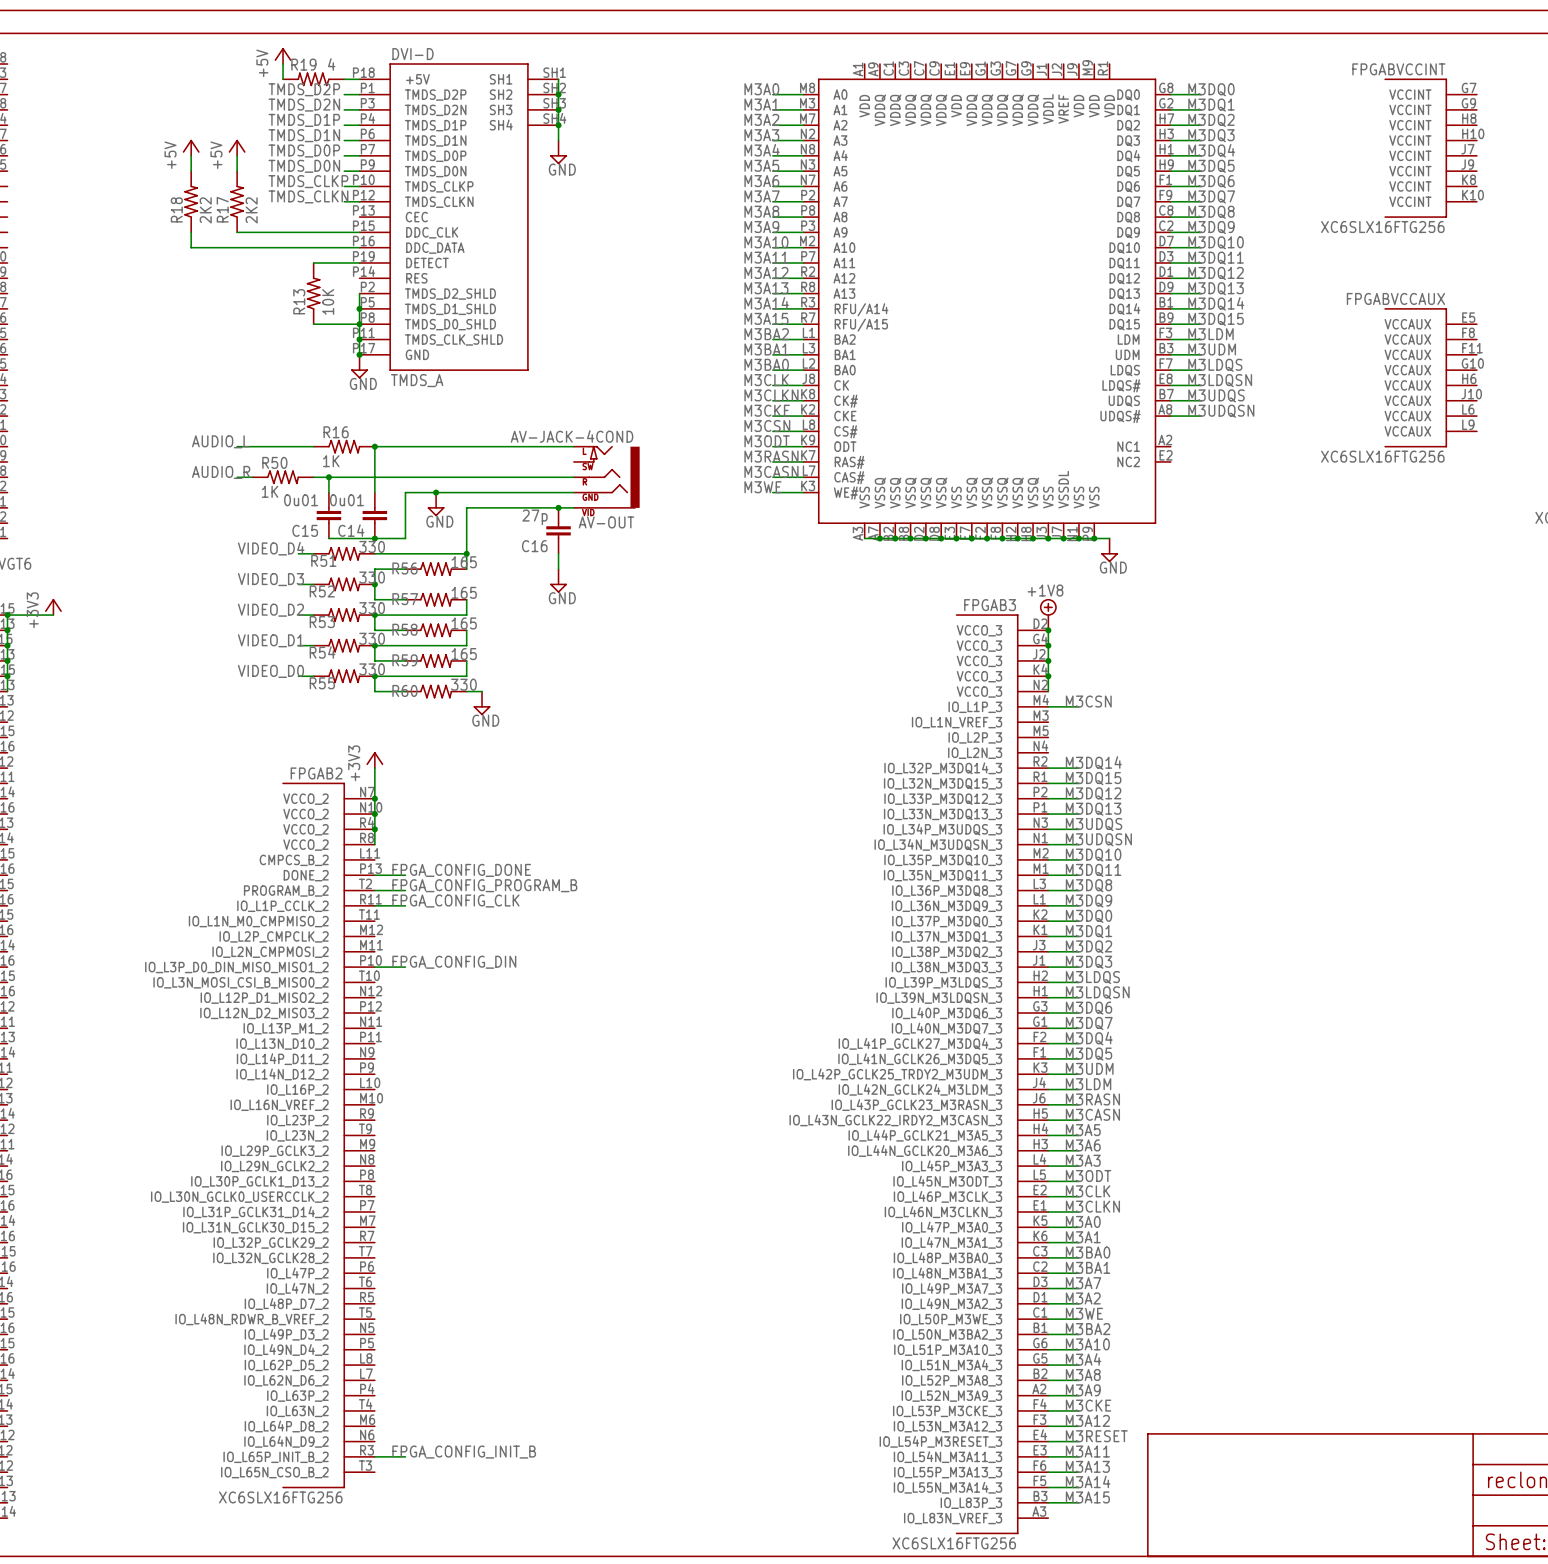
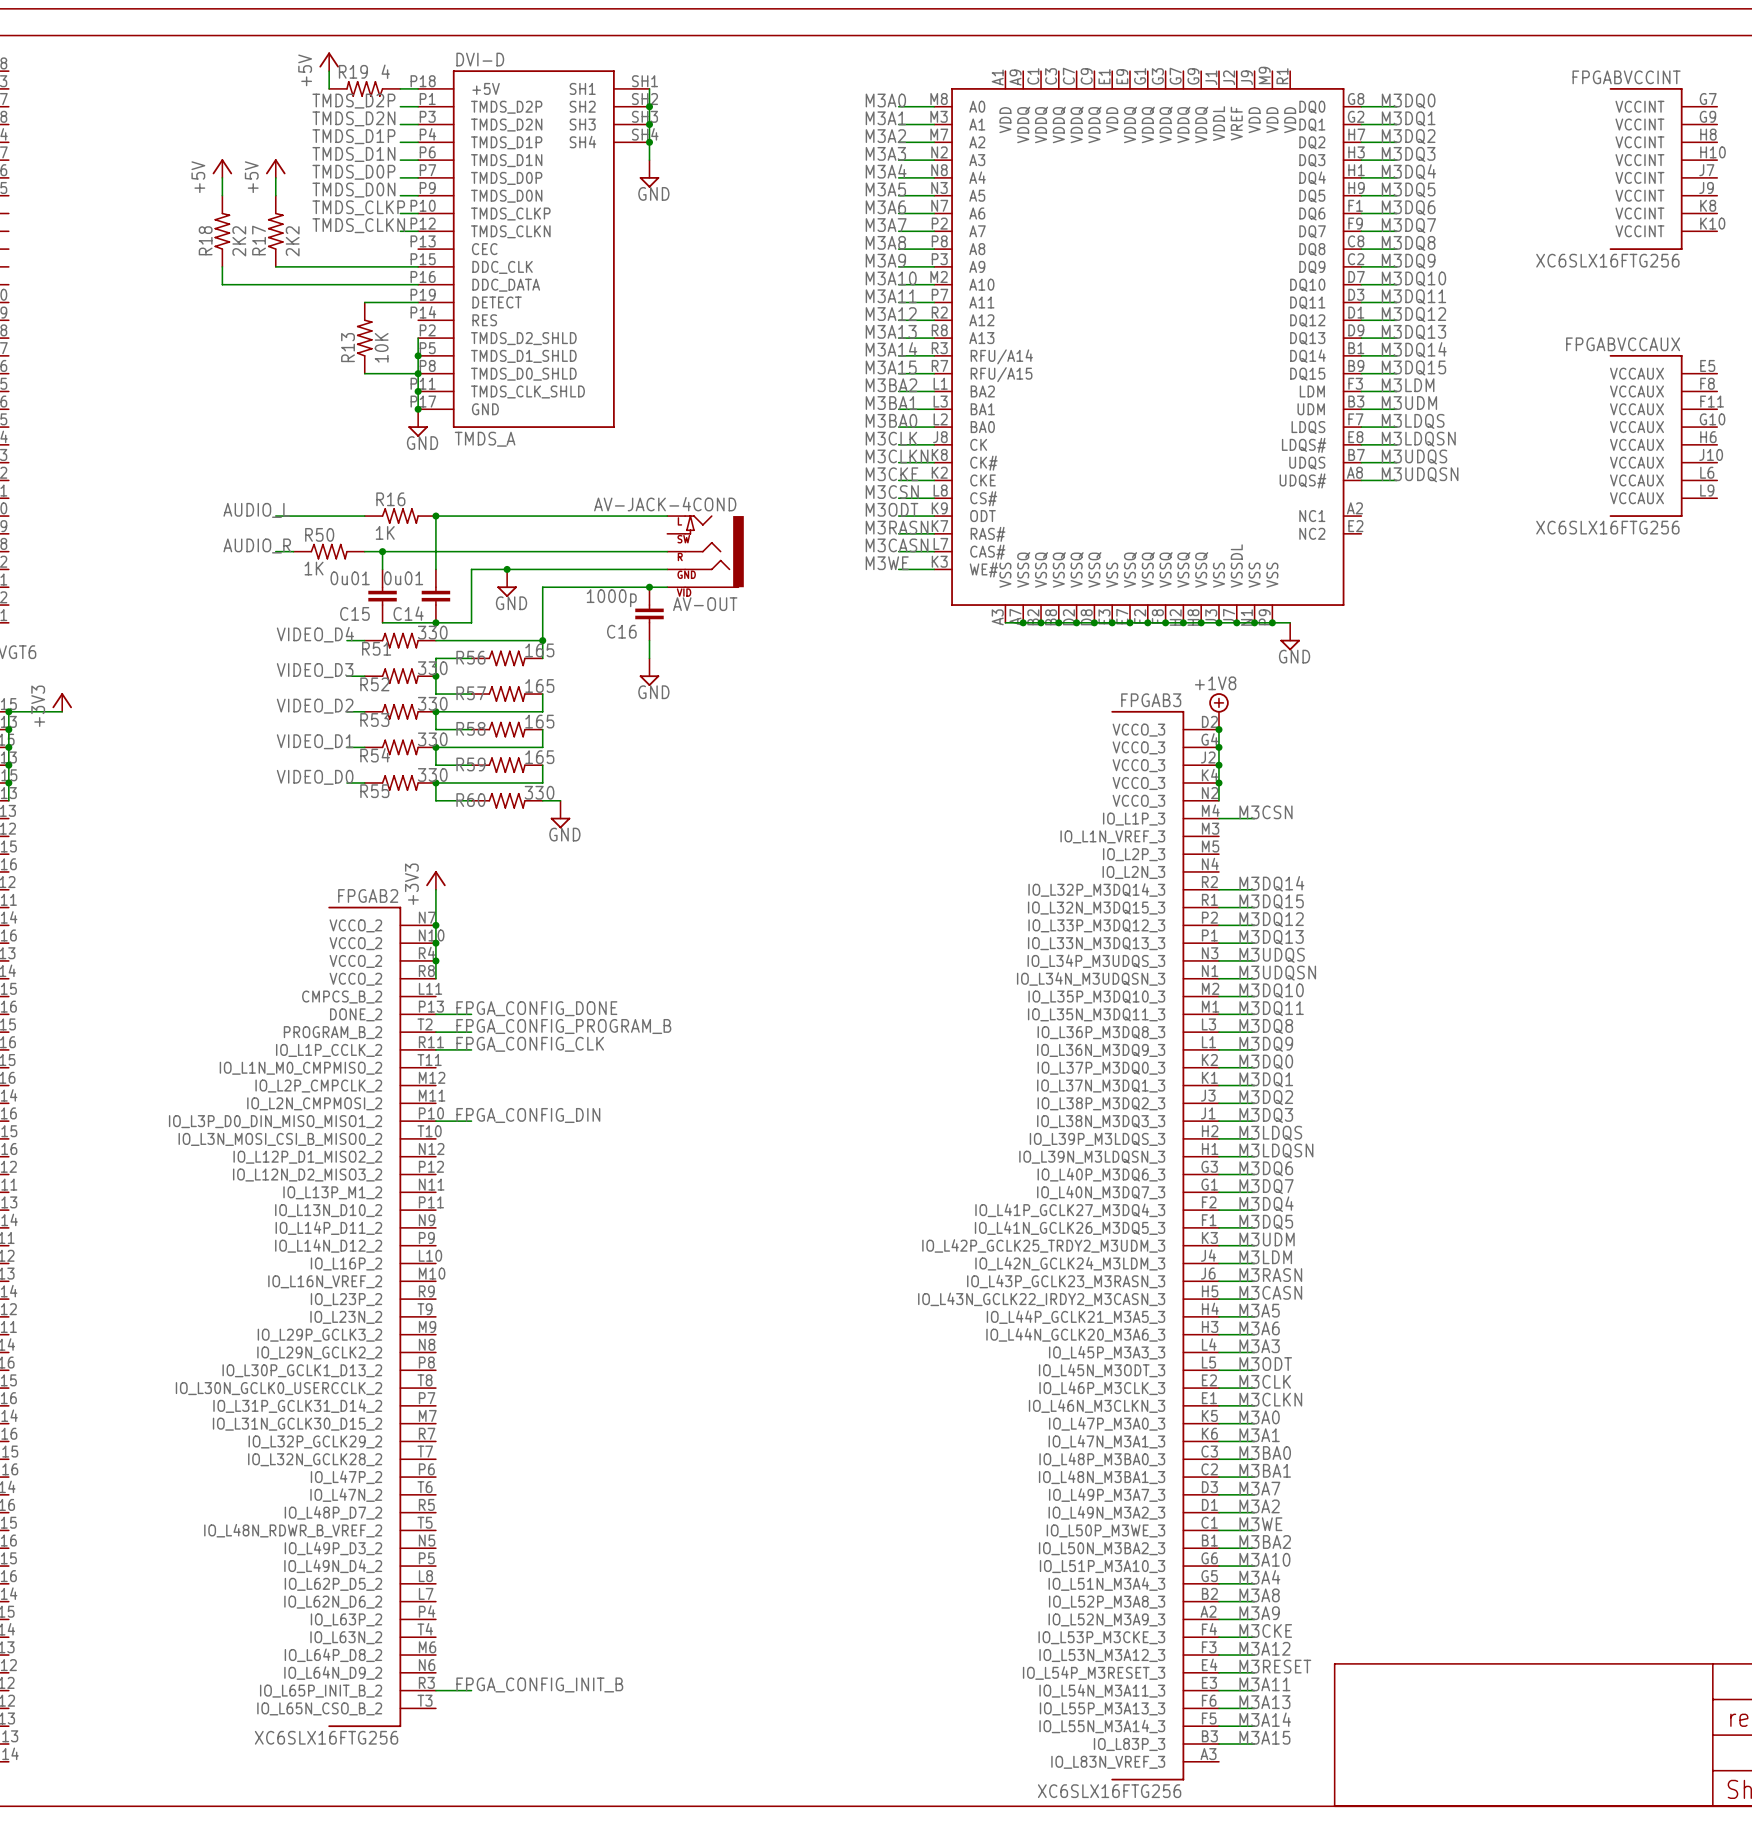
C16 value: 27p (535, 517) -> 1000p (611, 598)

